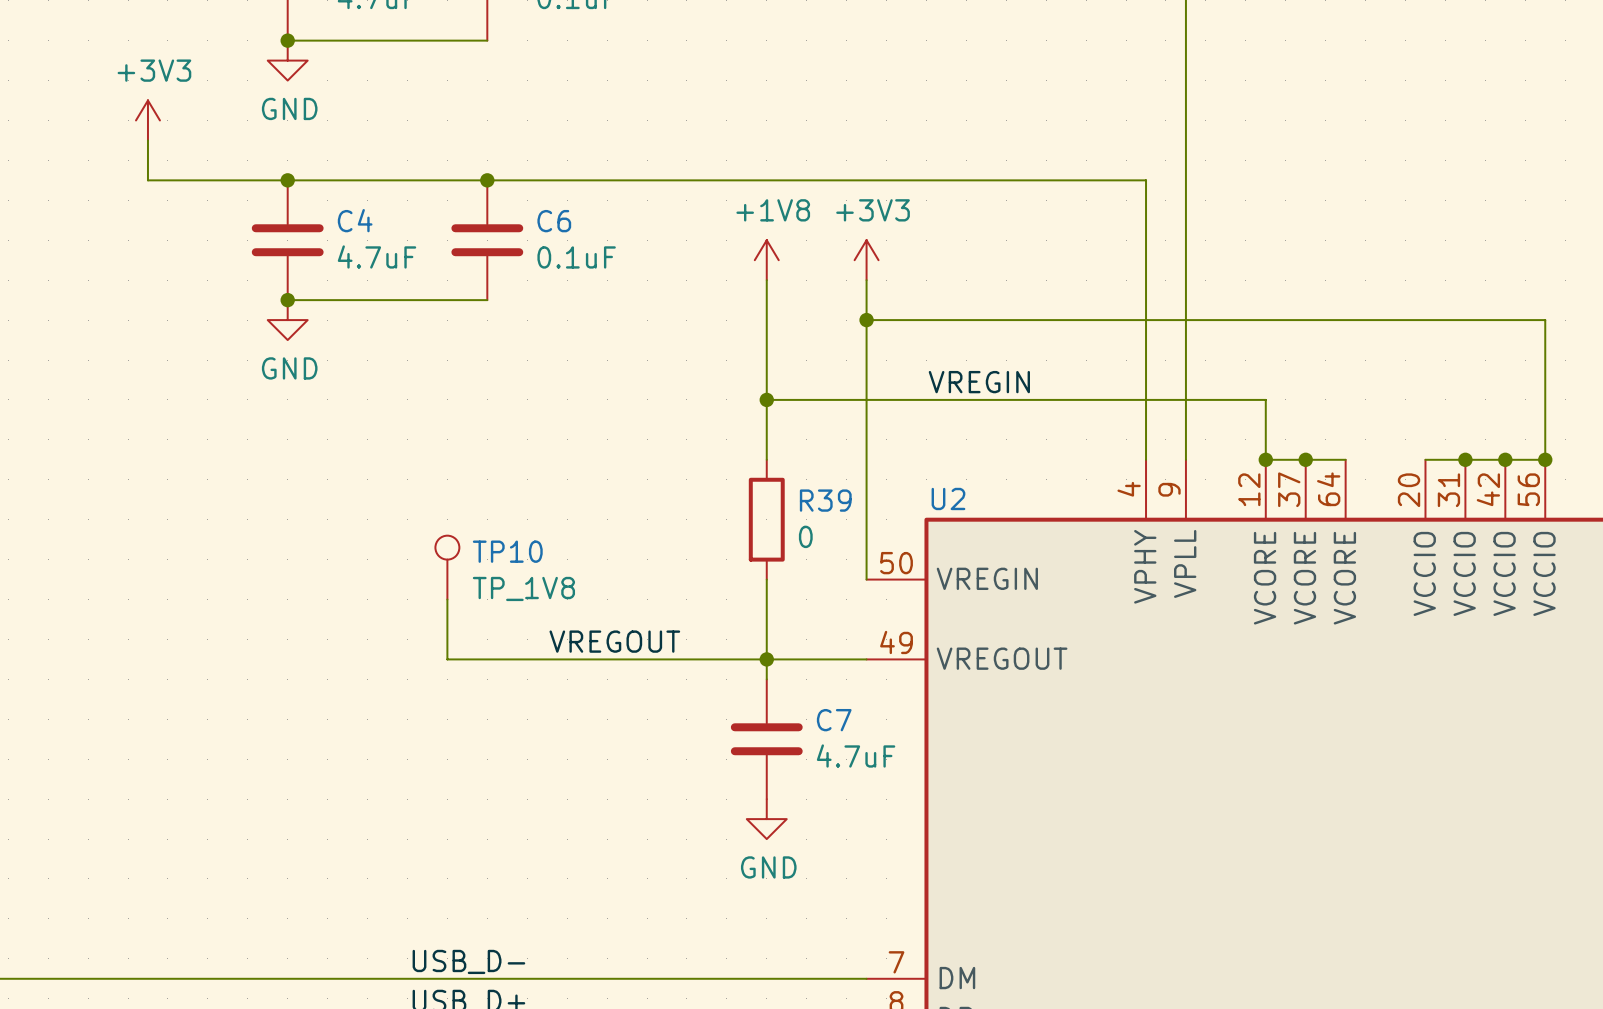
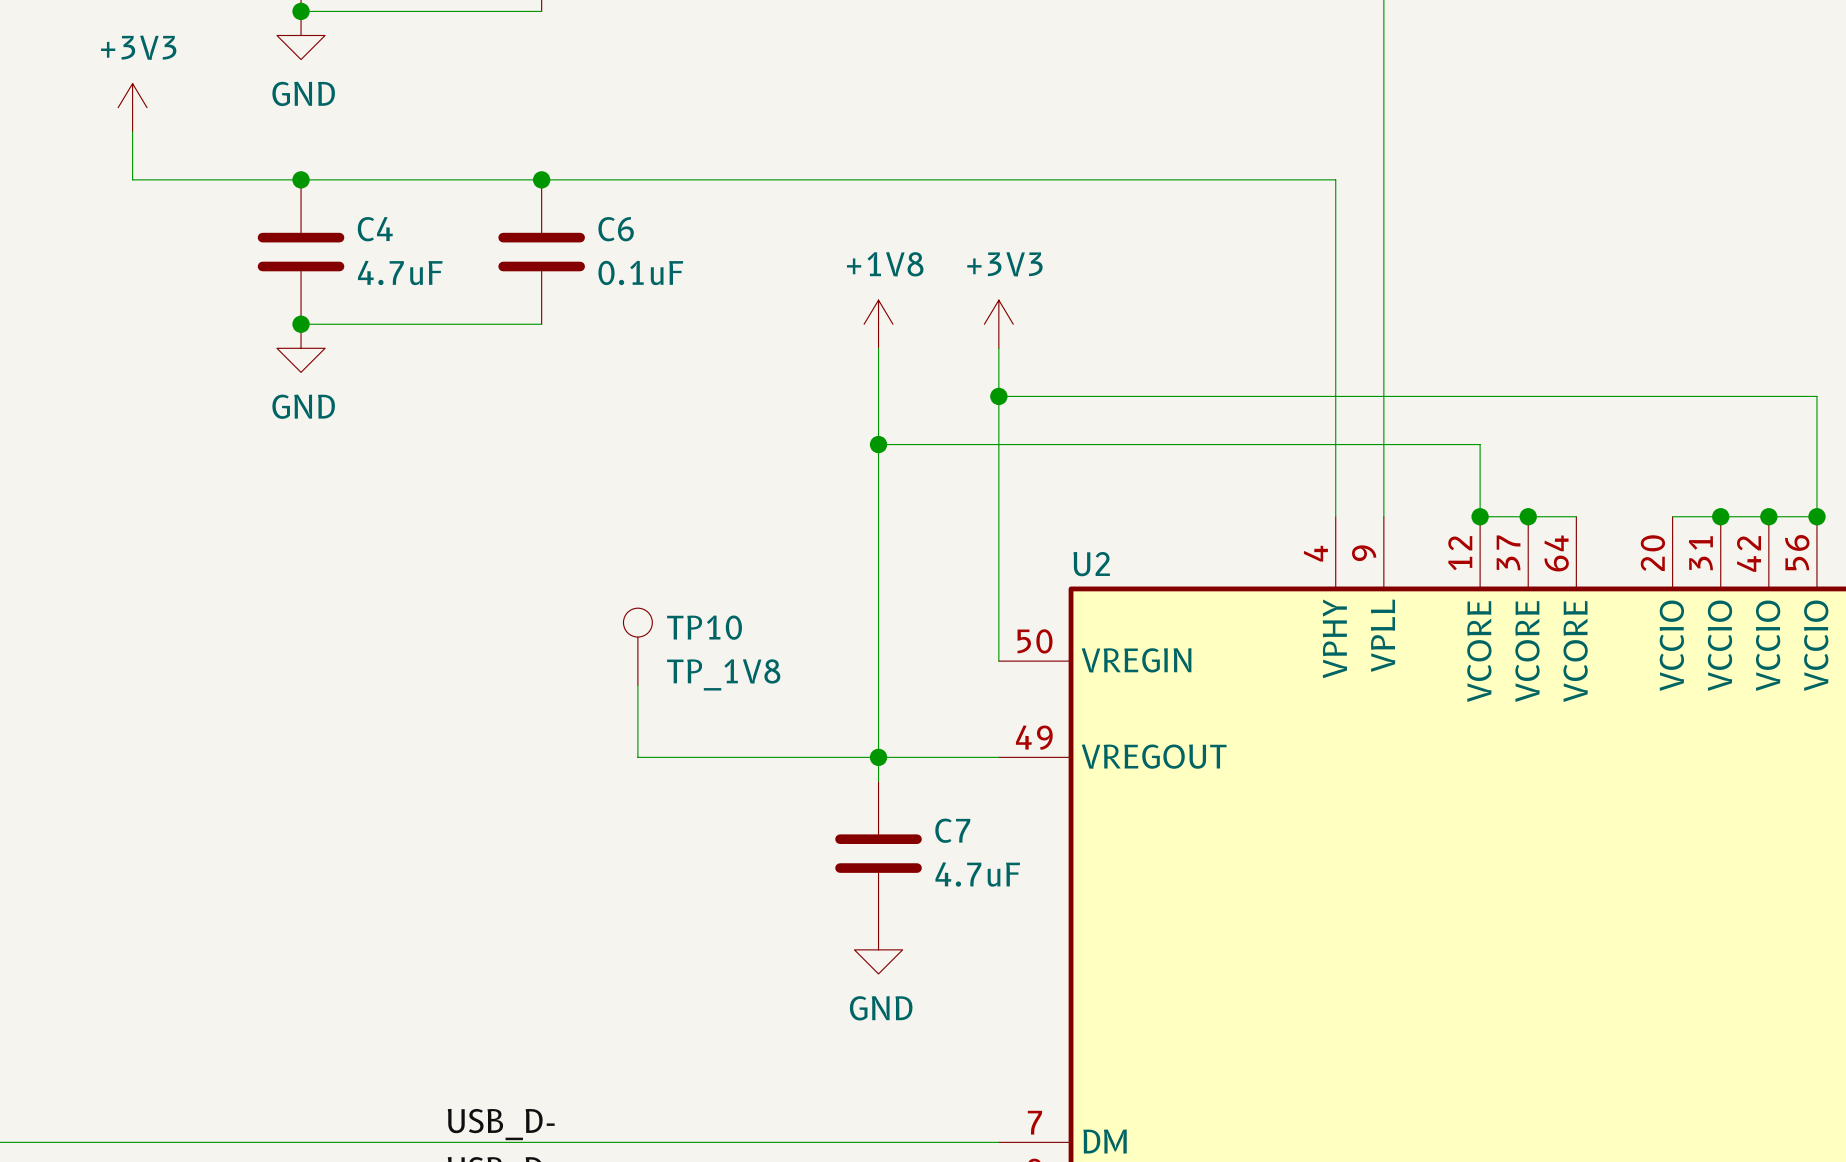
power symbol position: +1V8 (766, 260) -> +1V8 (878, 324)
power symbol position: +3V3 (866, 260) -> +3V3 (998, 324)
wire: (866, 280) (866, 320) (1545, 320) (1545, 360) -> (998, 396) (1816, 396)
junction position: (866, 320) -> (998, 396)
label: VREGIN (979, 382) -> none
wire: none -> (878, 516) (878, 661)
R39: 0 (766, 519) -> none
TP10 position: (447, 567) -> (637, 646)
wire: (447, 599) (447, 659) (567, 659) -> (637, 685) (637, 757)
label: VREGOUT (614, 641) -> none

